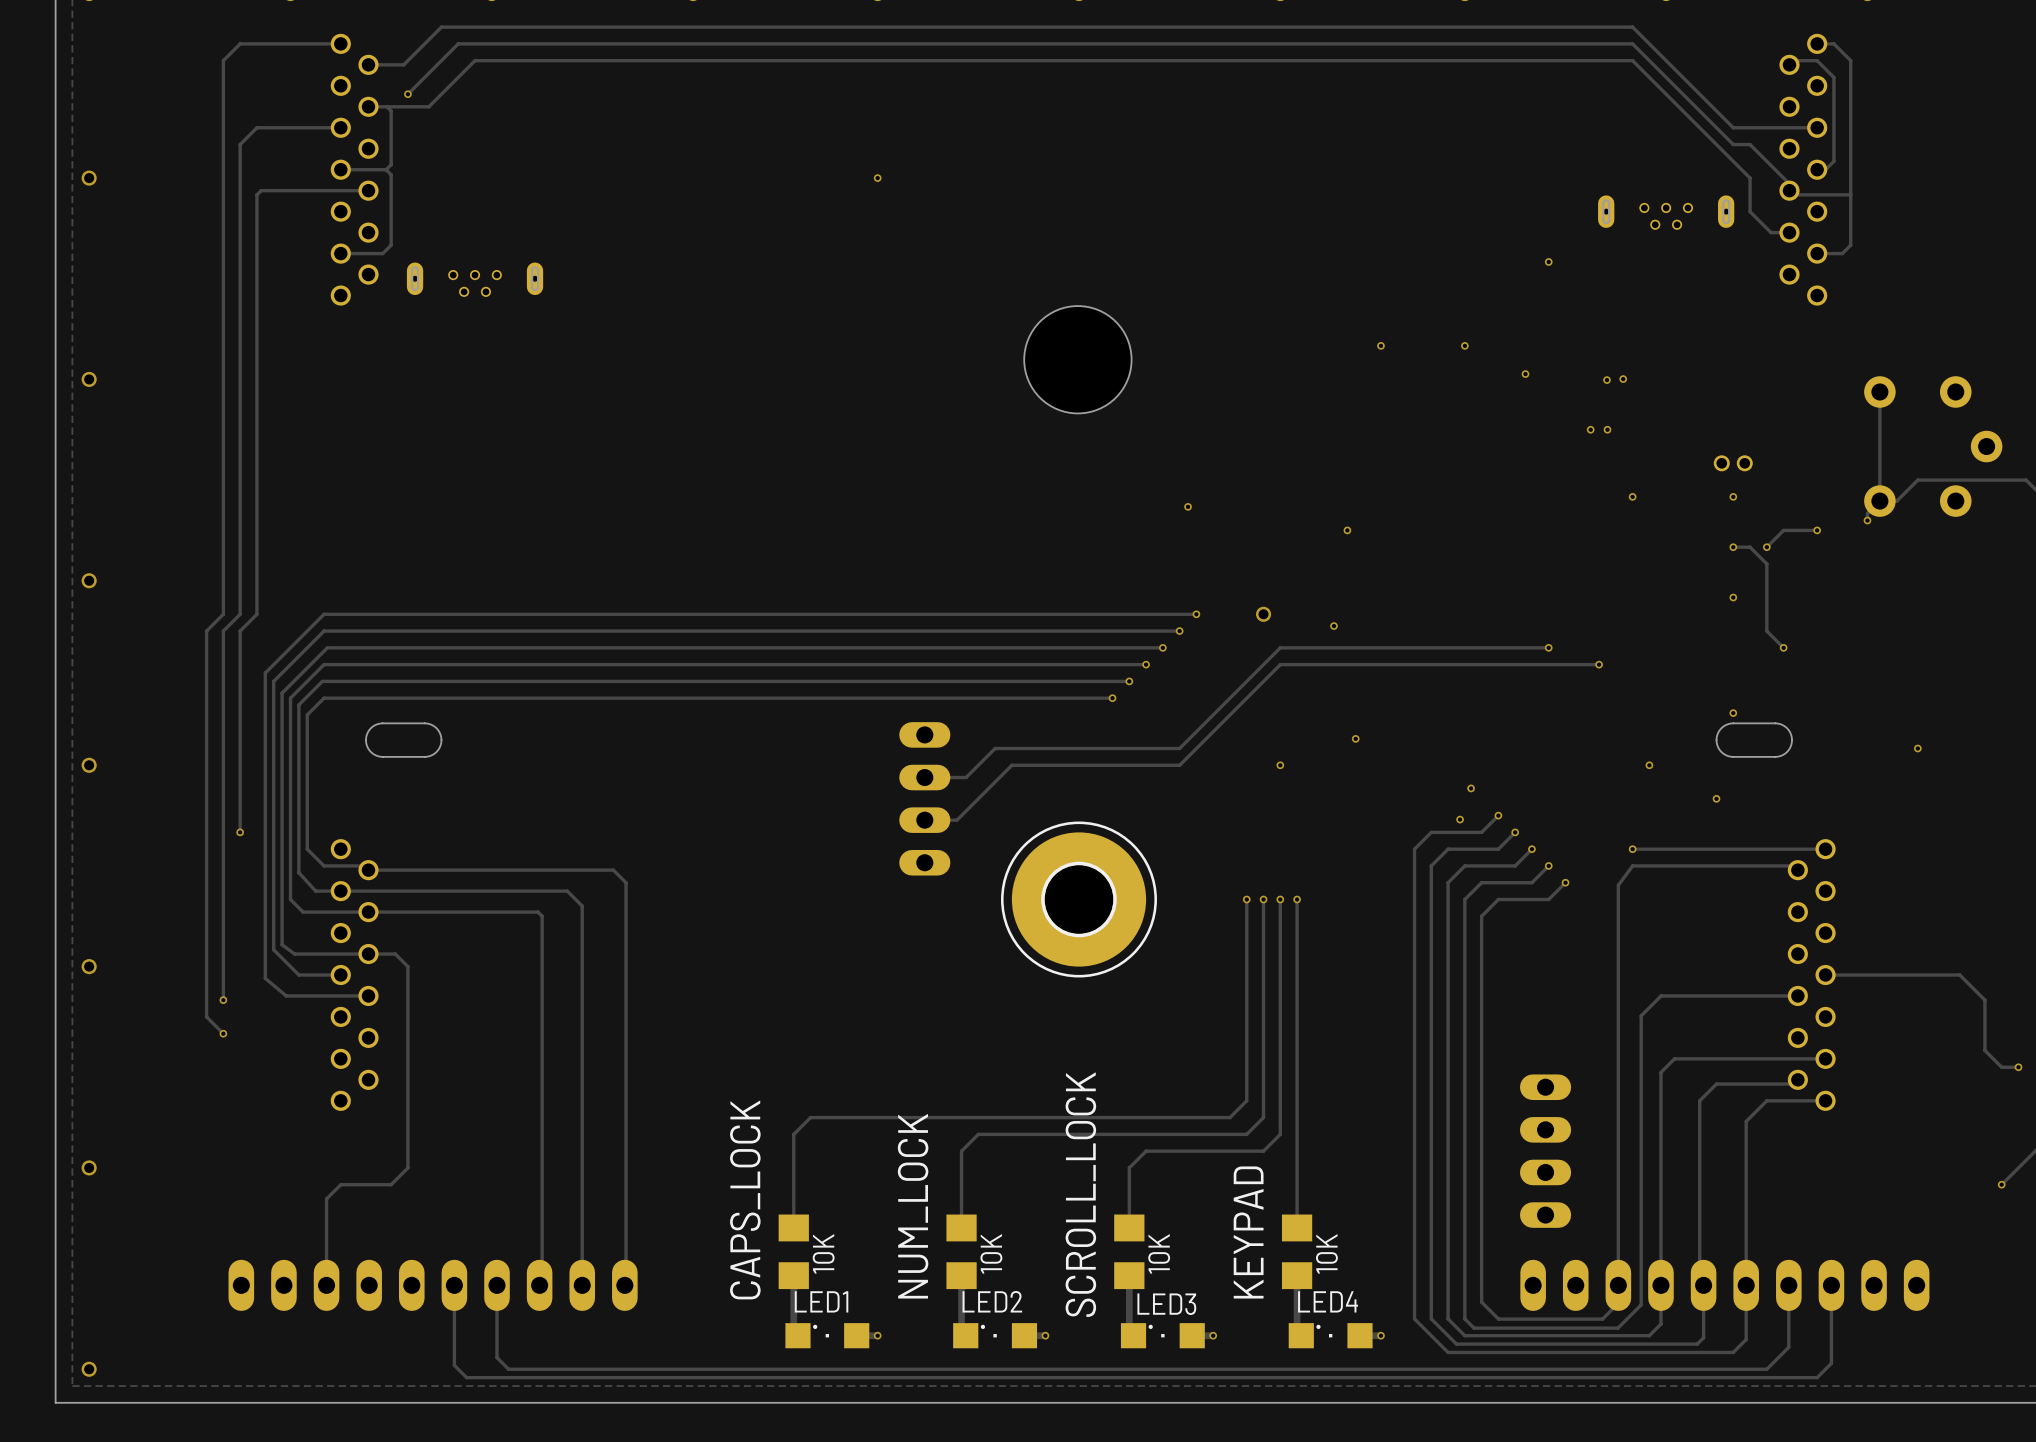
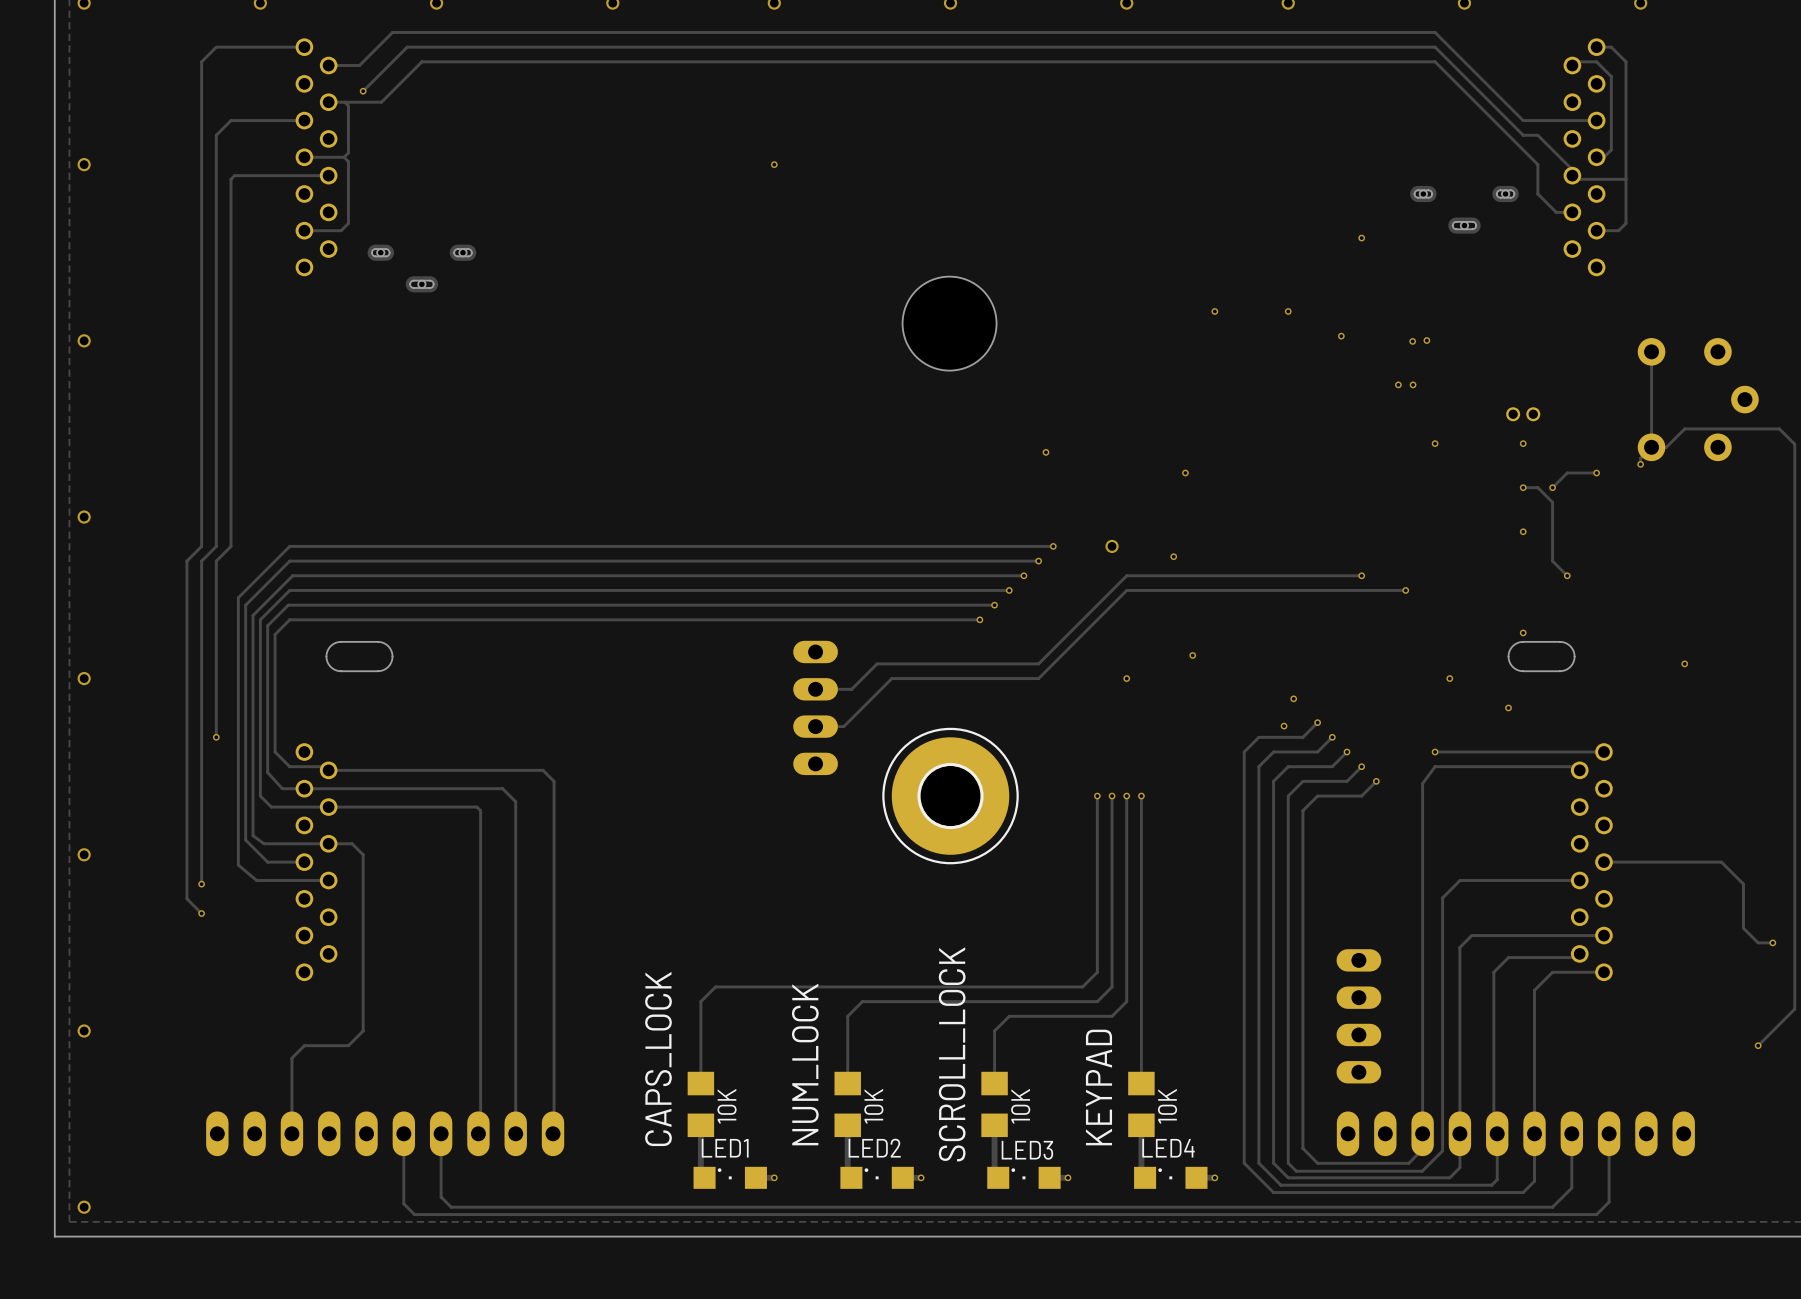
part: (1666, 212) -> none
part: none -> (1464, 209)
part: (475, 279) -> none
part: none -> (421, 268)

